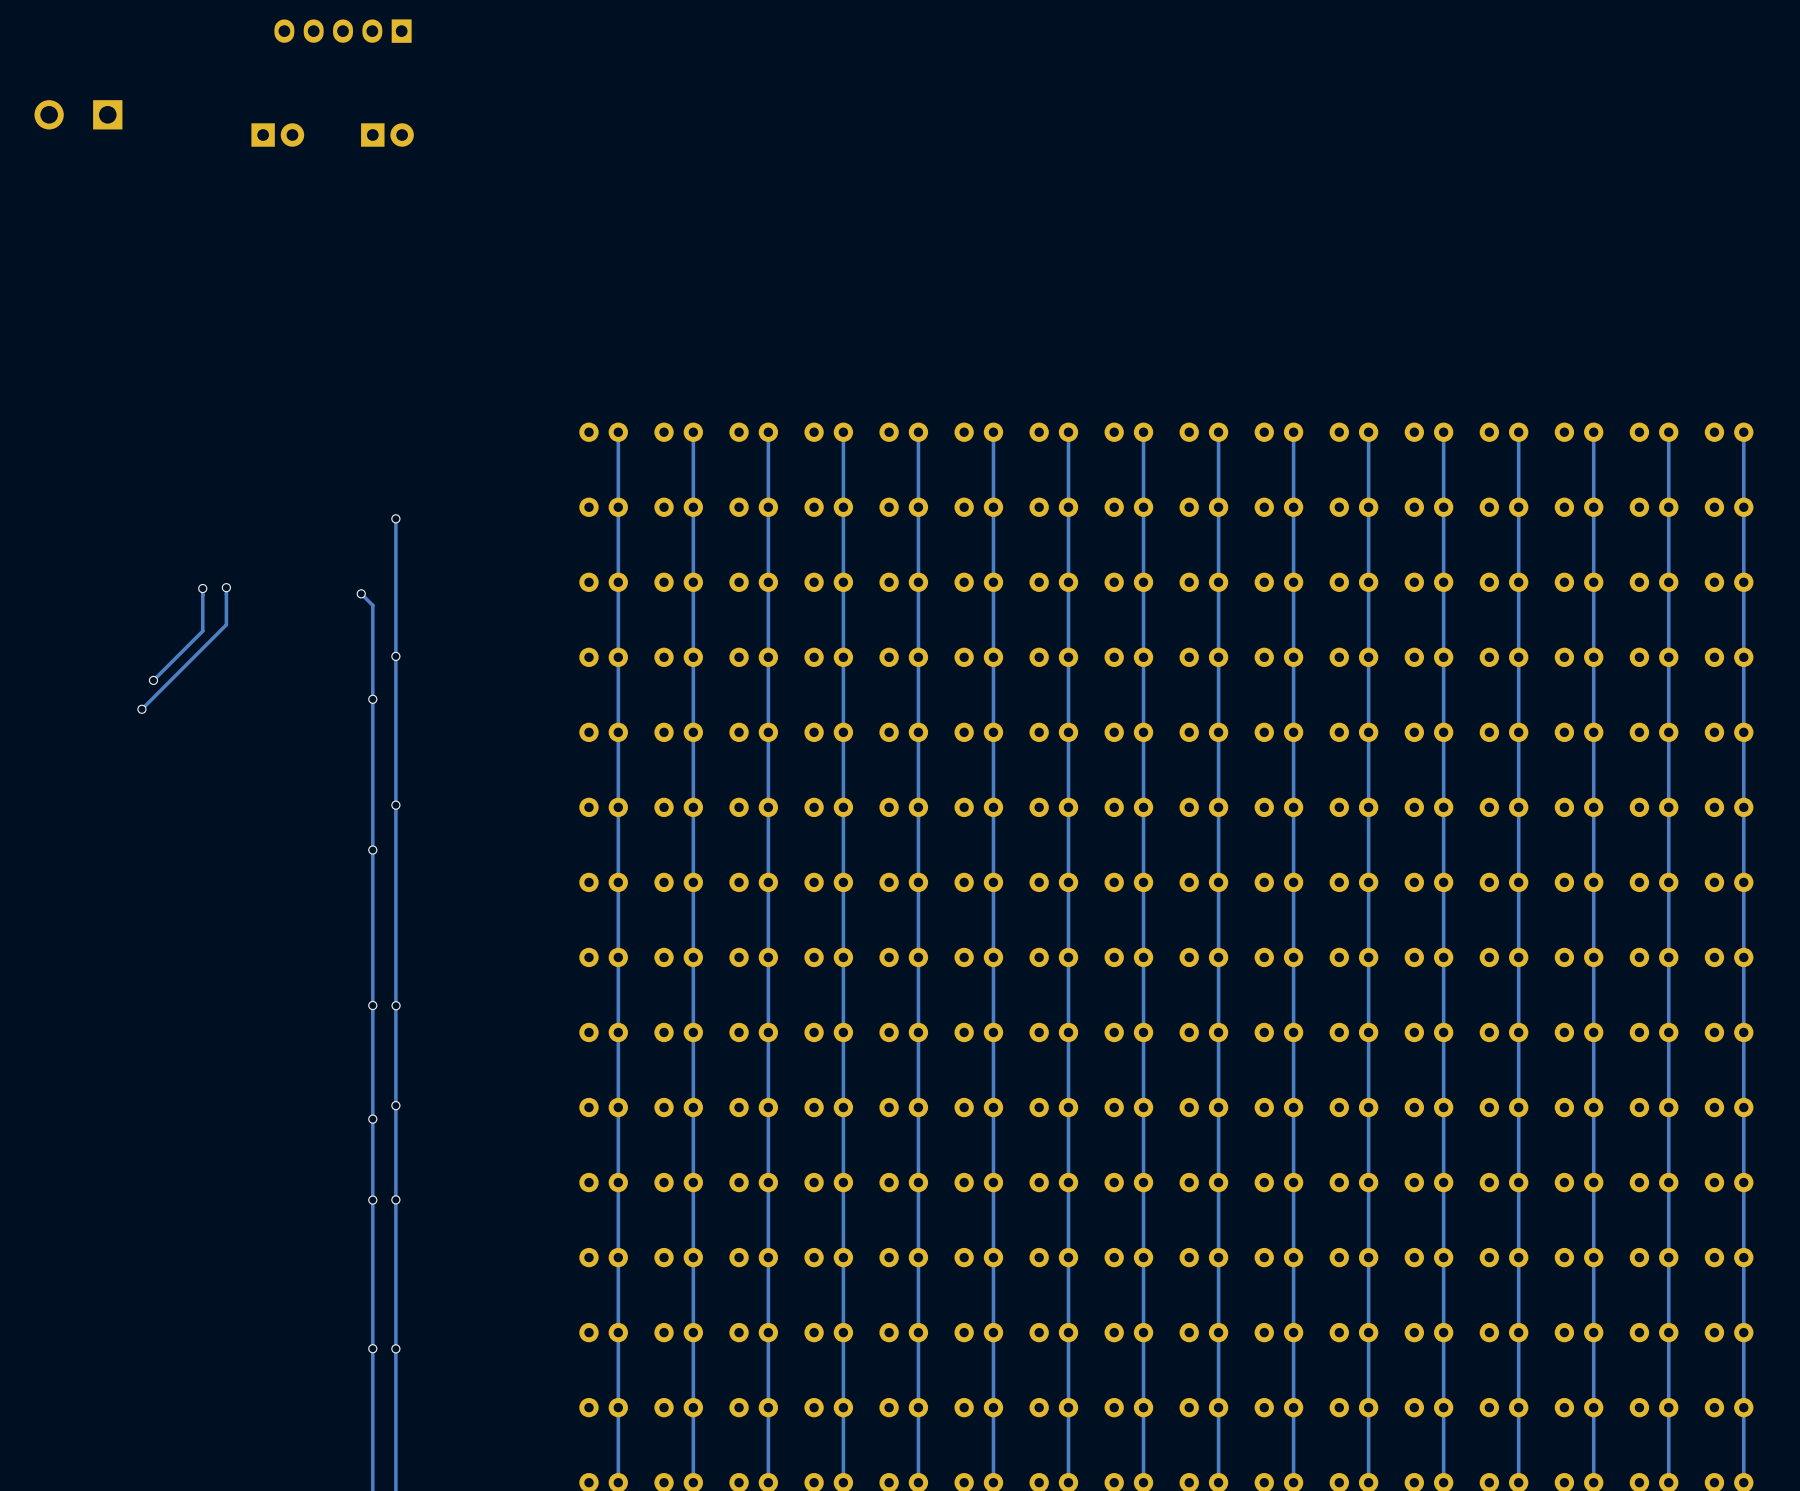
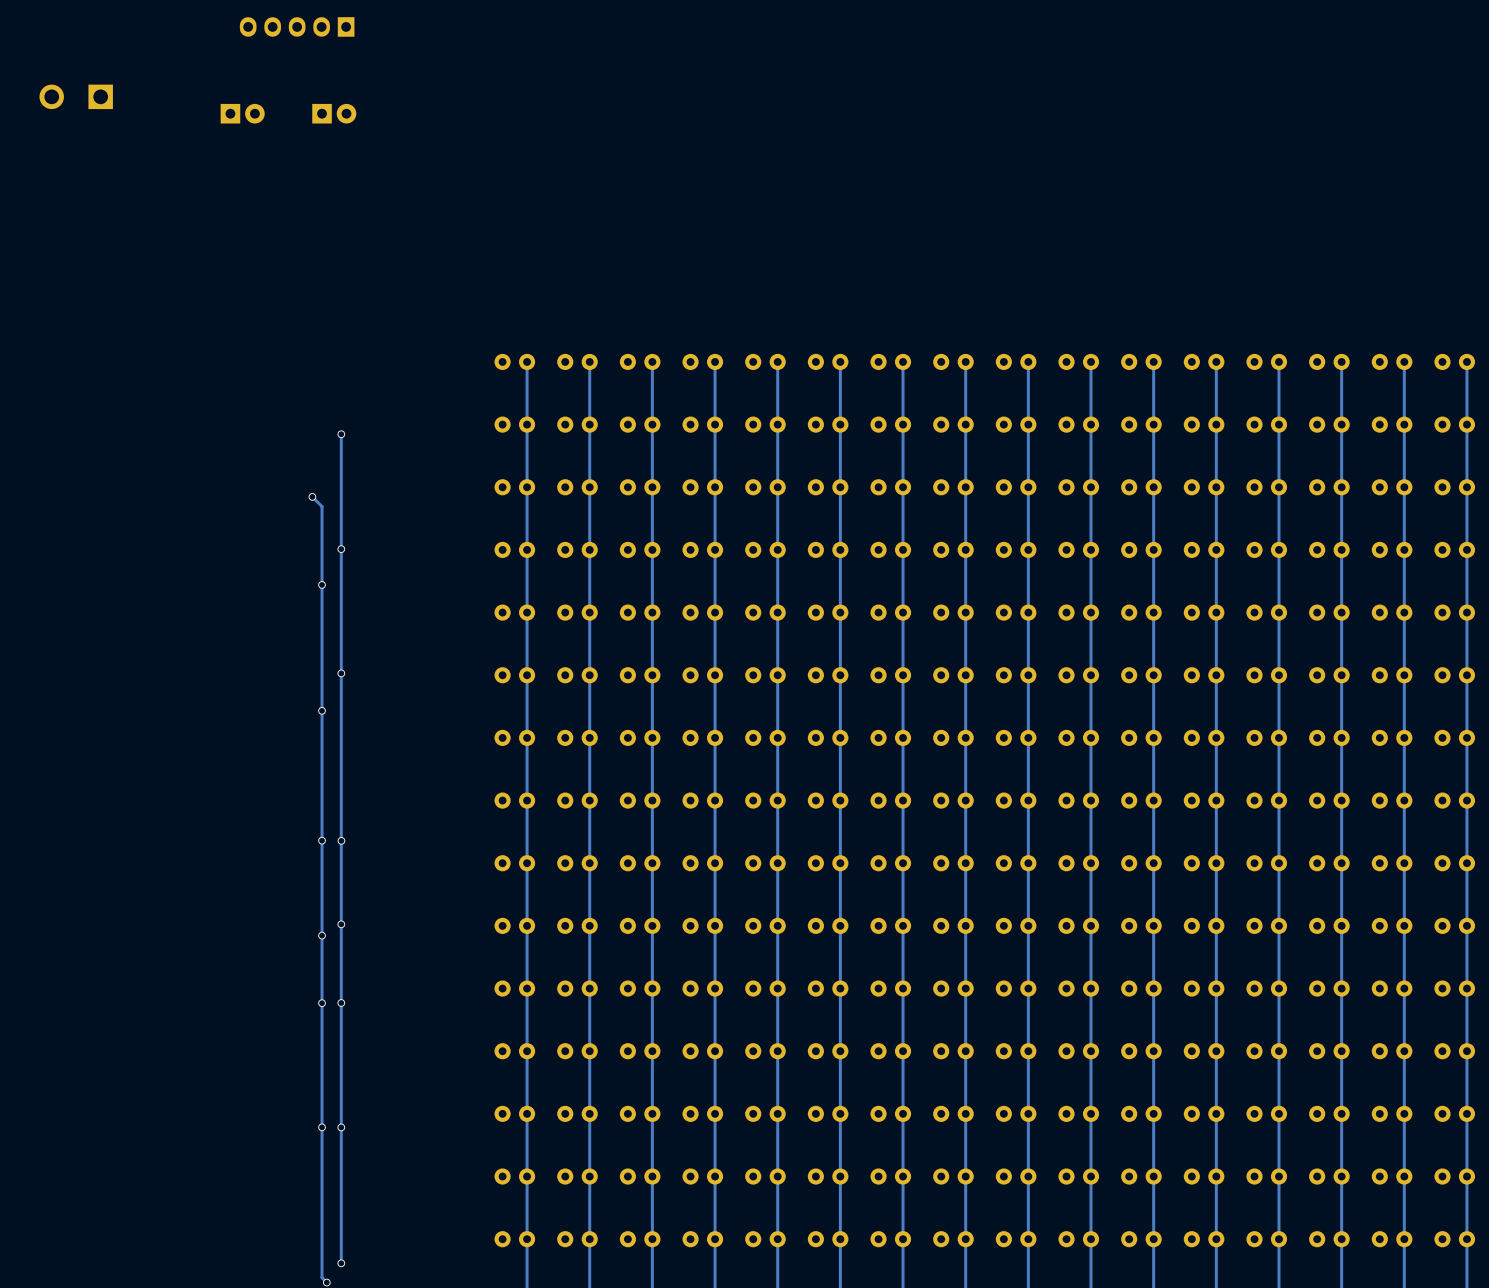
track: (226, 587) (226, 624) (141, 709) -> none
via: (226, 587) -> none
track: (202, 588) (202, 631) (153, 680) -> none
via: (202, 588) -> none
via: (153, 680) -> none
via: (141, 709) -> none

